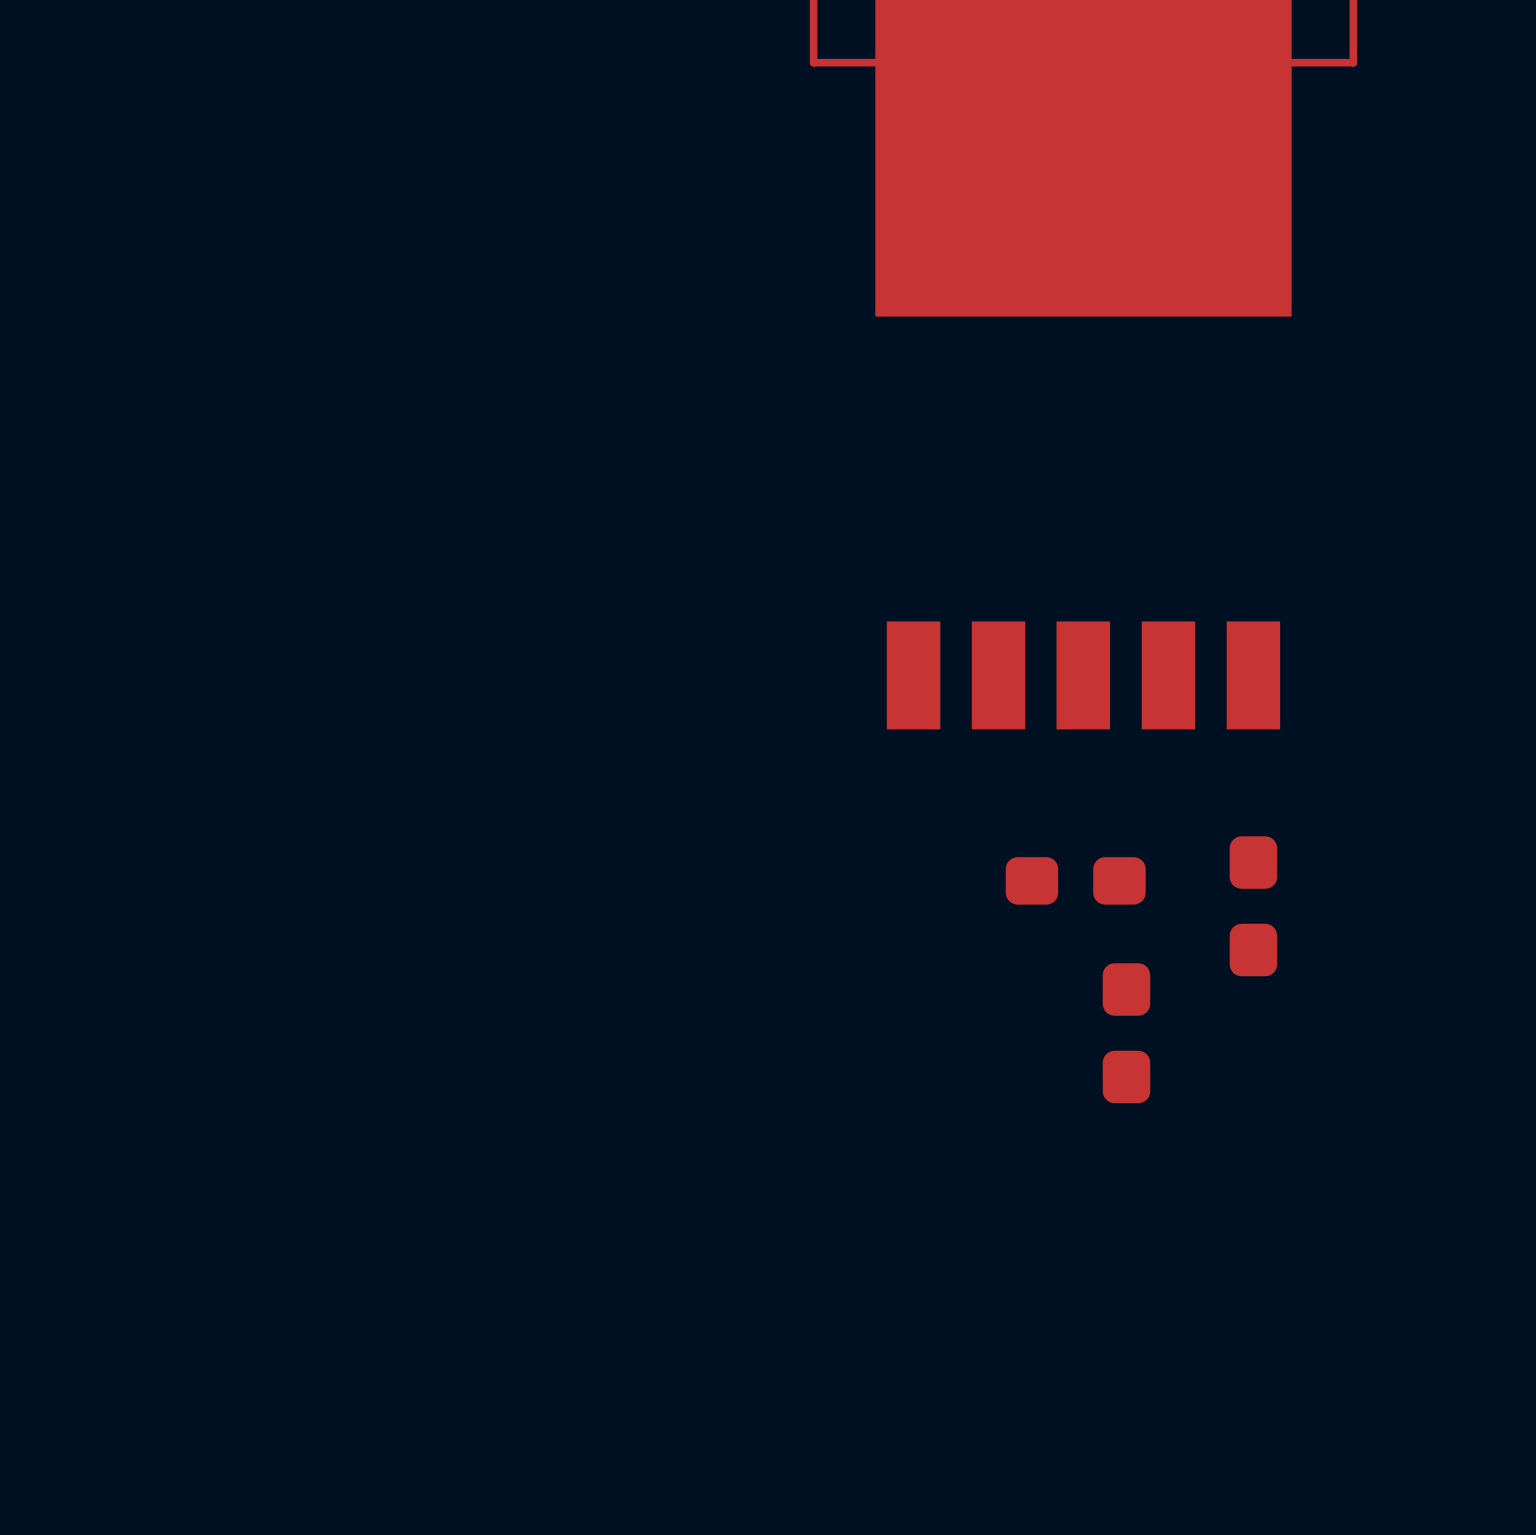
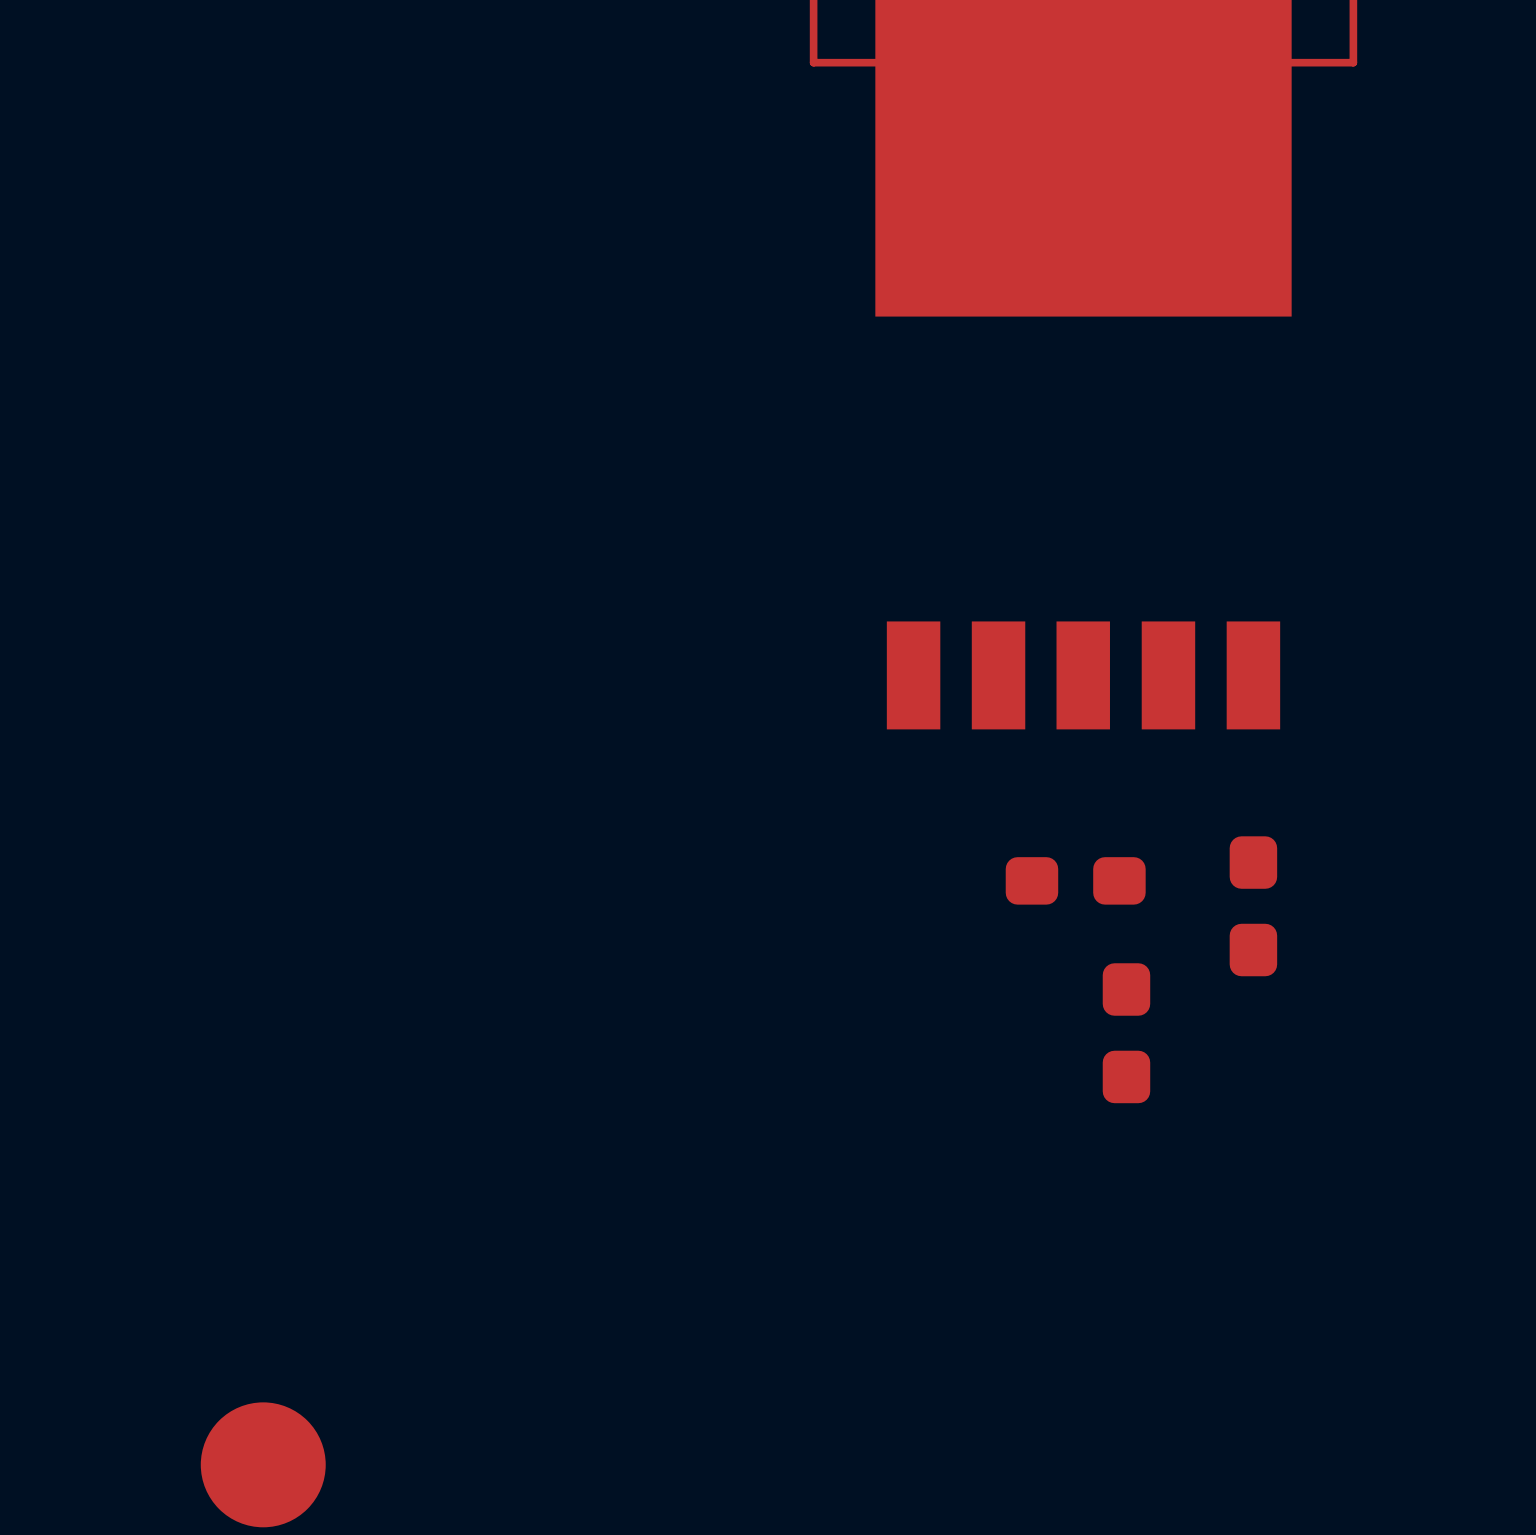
part: none -> (263, 1464)

